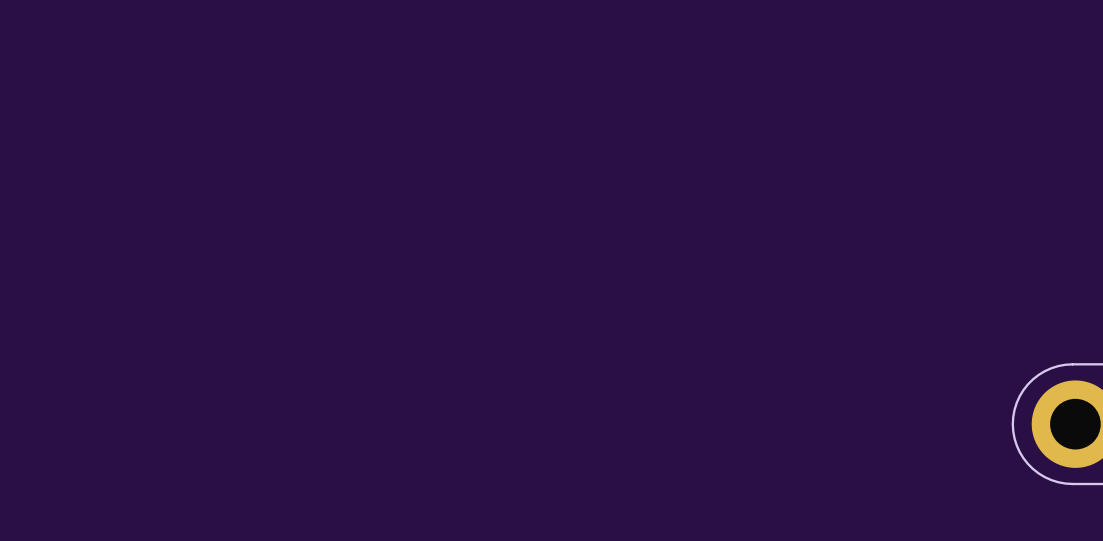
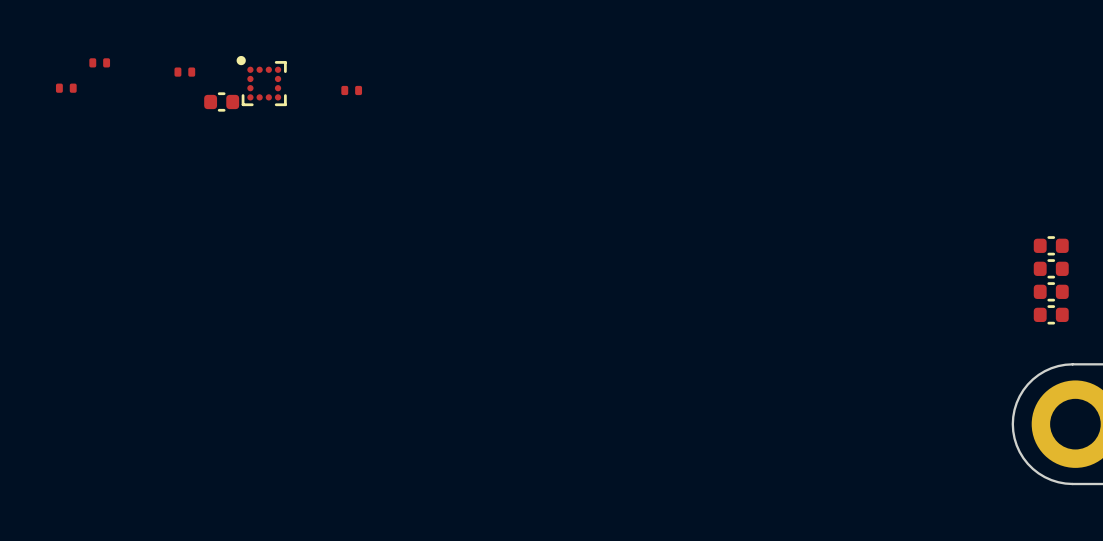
part: none -> (99, 62)
part: none -> (184, 72)
part: none -> (261, 81)
part: none -> (66, 88)
part: none -> (351, 90)
part: none -> (221, 101)
part: none -> (1051, 245)
part: none -> (1051, 268)
part: none -> (1051, 291)
part: none -> (1051, 314)

